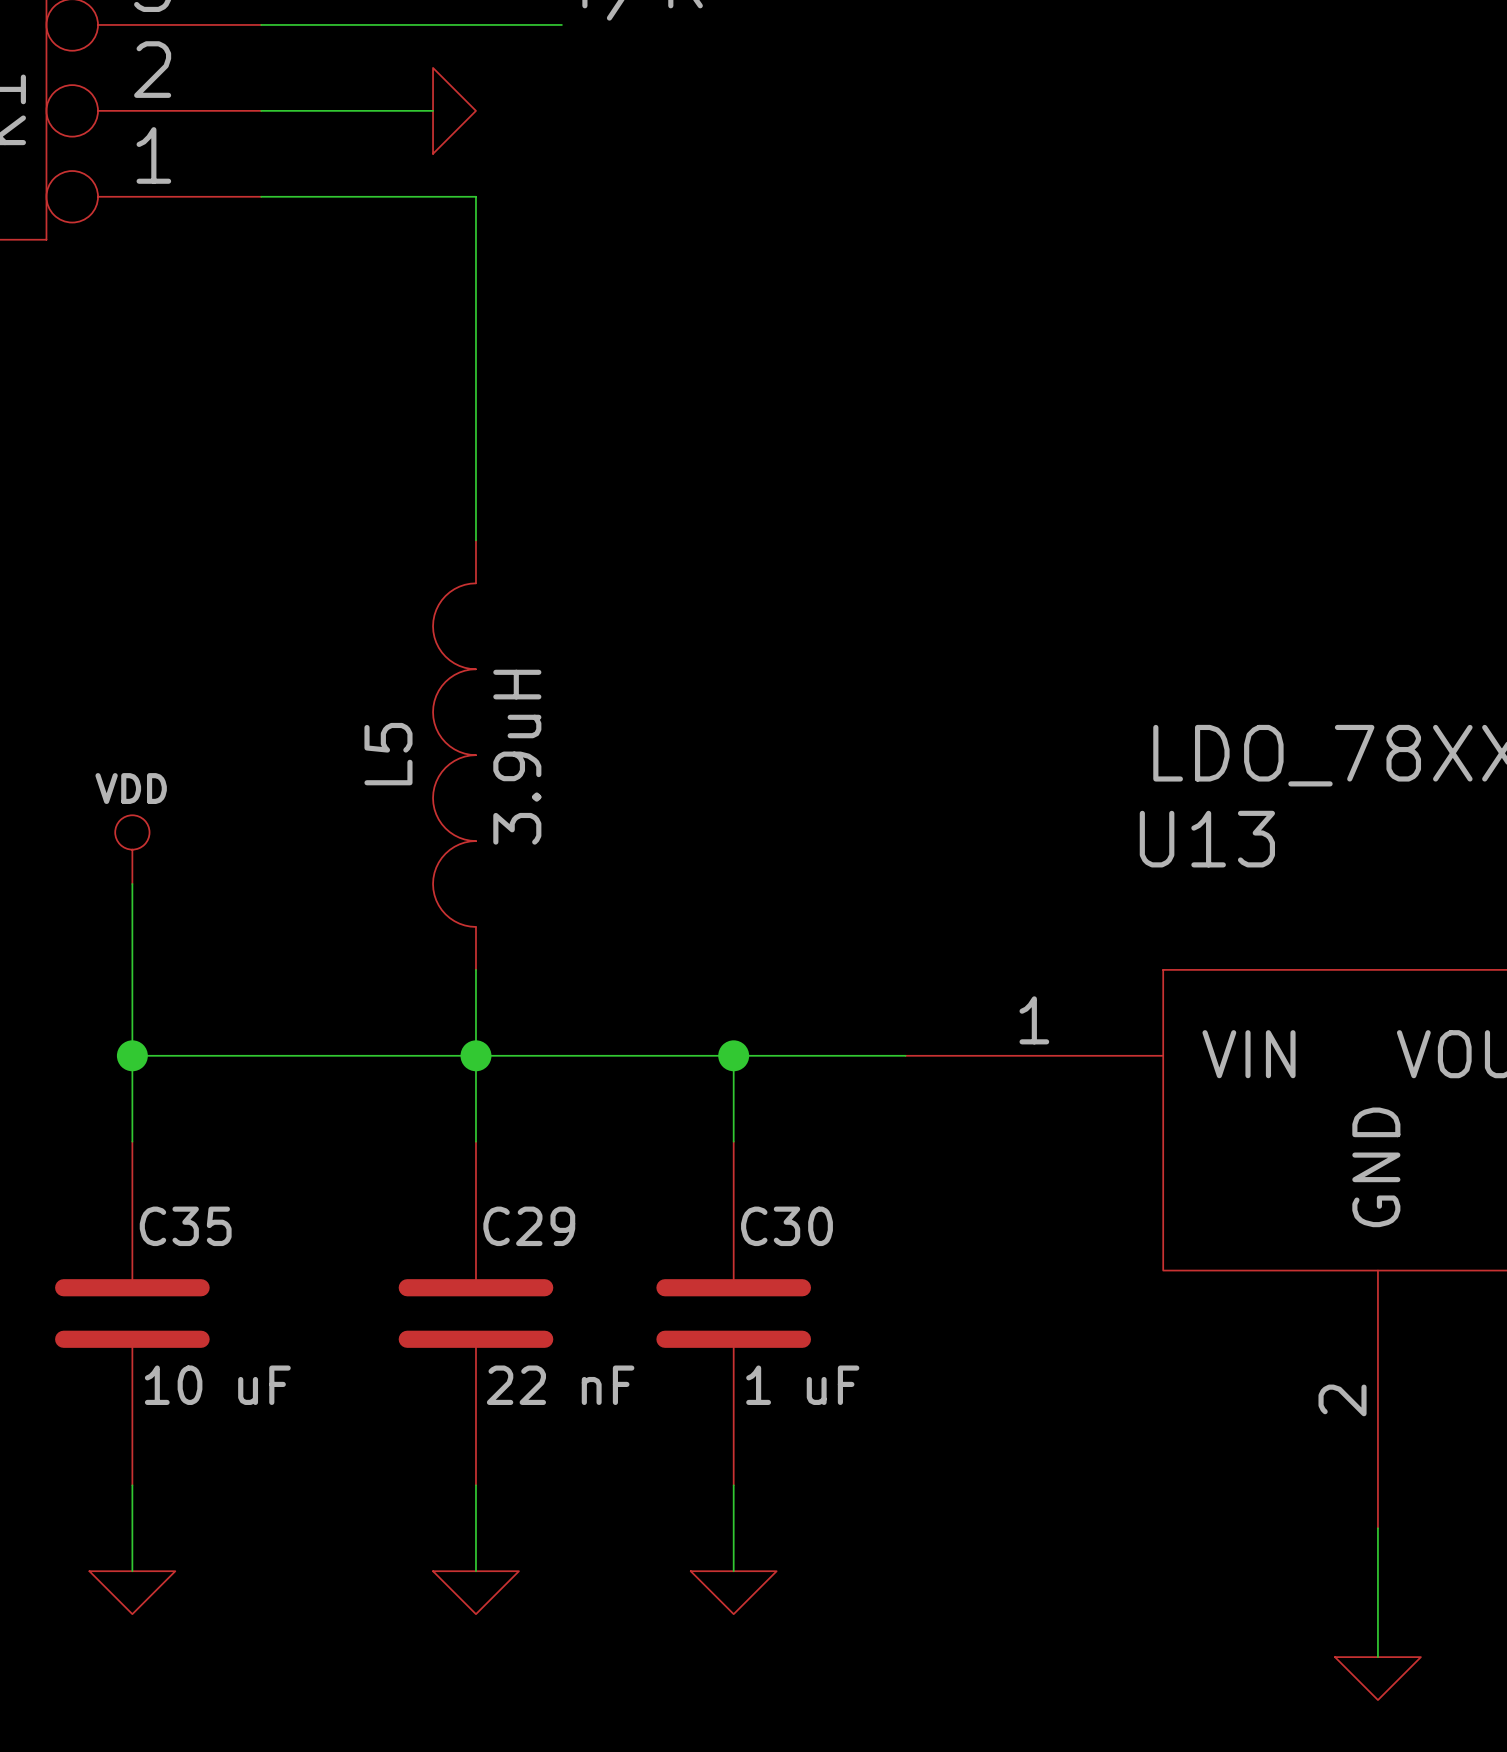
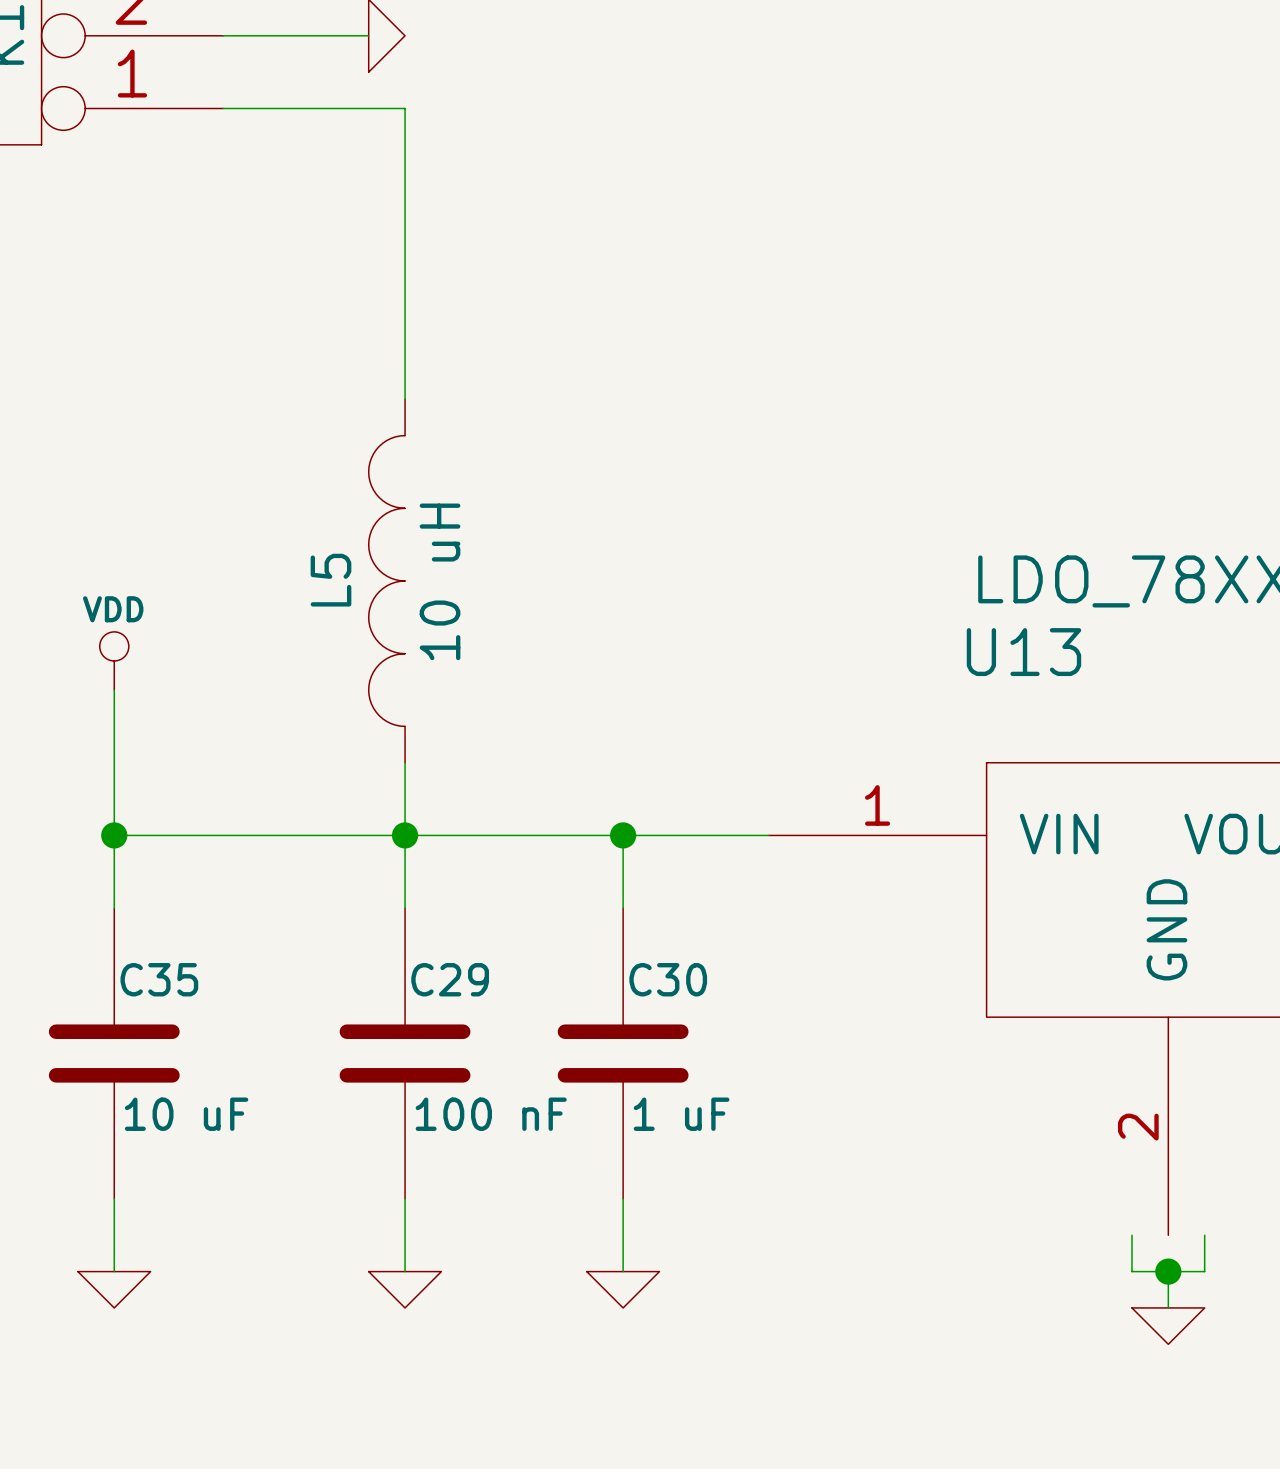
L5 value: 3.9uH (517, 757) -> 10 uH (440, 581)
C29 value: 22 nF (560, 1385) -> 100 nF (491, 1114)
wire: none -> (1131, 1235) (1131, 1271) (1204, 1271) (1204, 1235)
wire: (1377, 1528) (1377, 1571) -> none
junction: none -> (1168, 1271)
wire: (1377, 1614) (1377, 1657) -> none
power symbol position: (1377, 1678) -> (1168, 1326)

